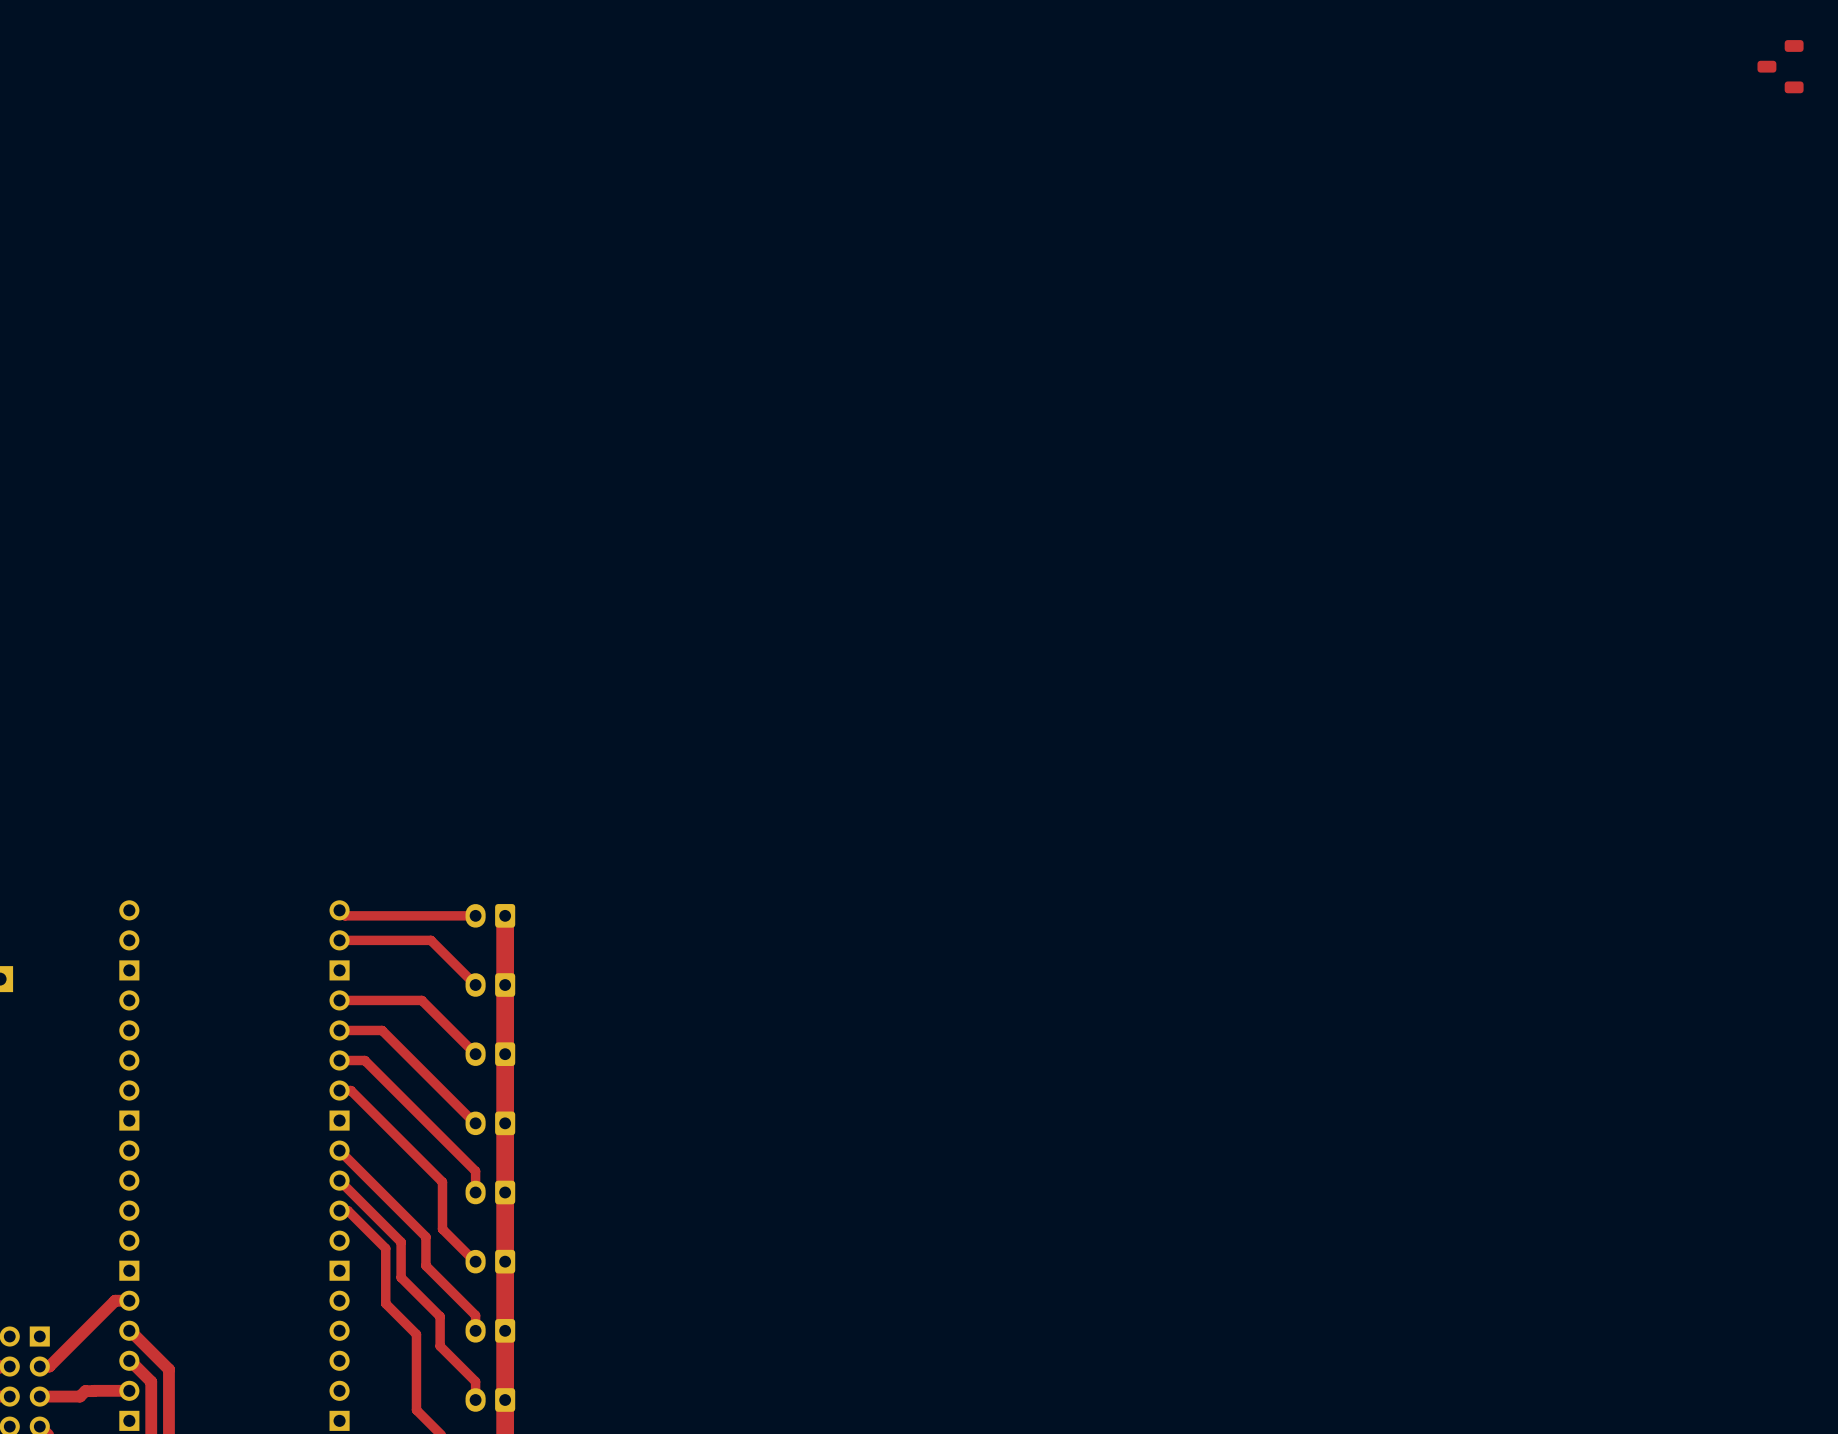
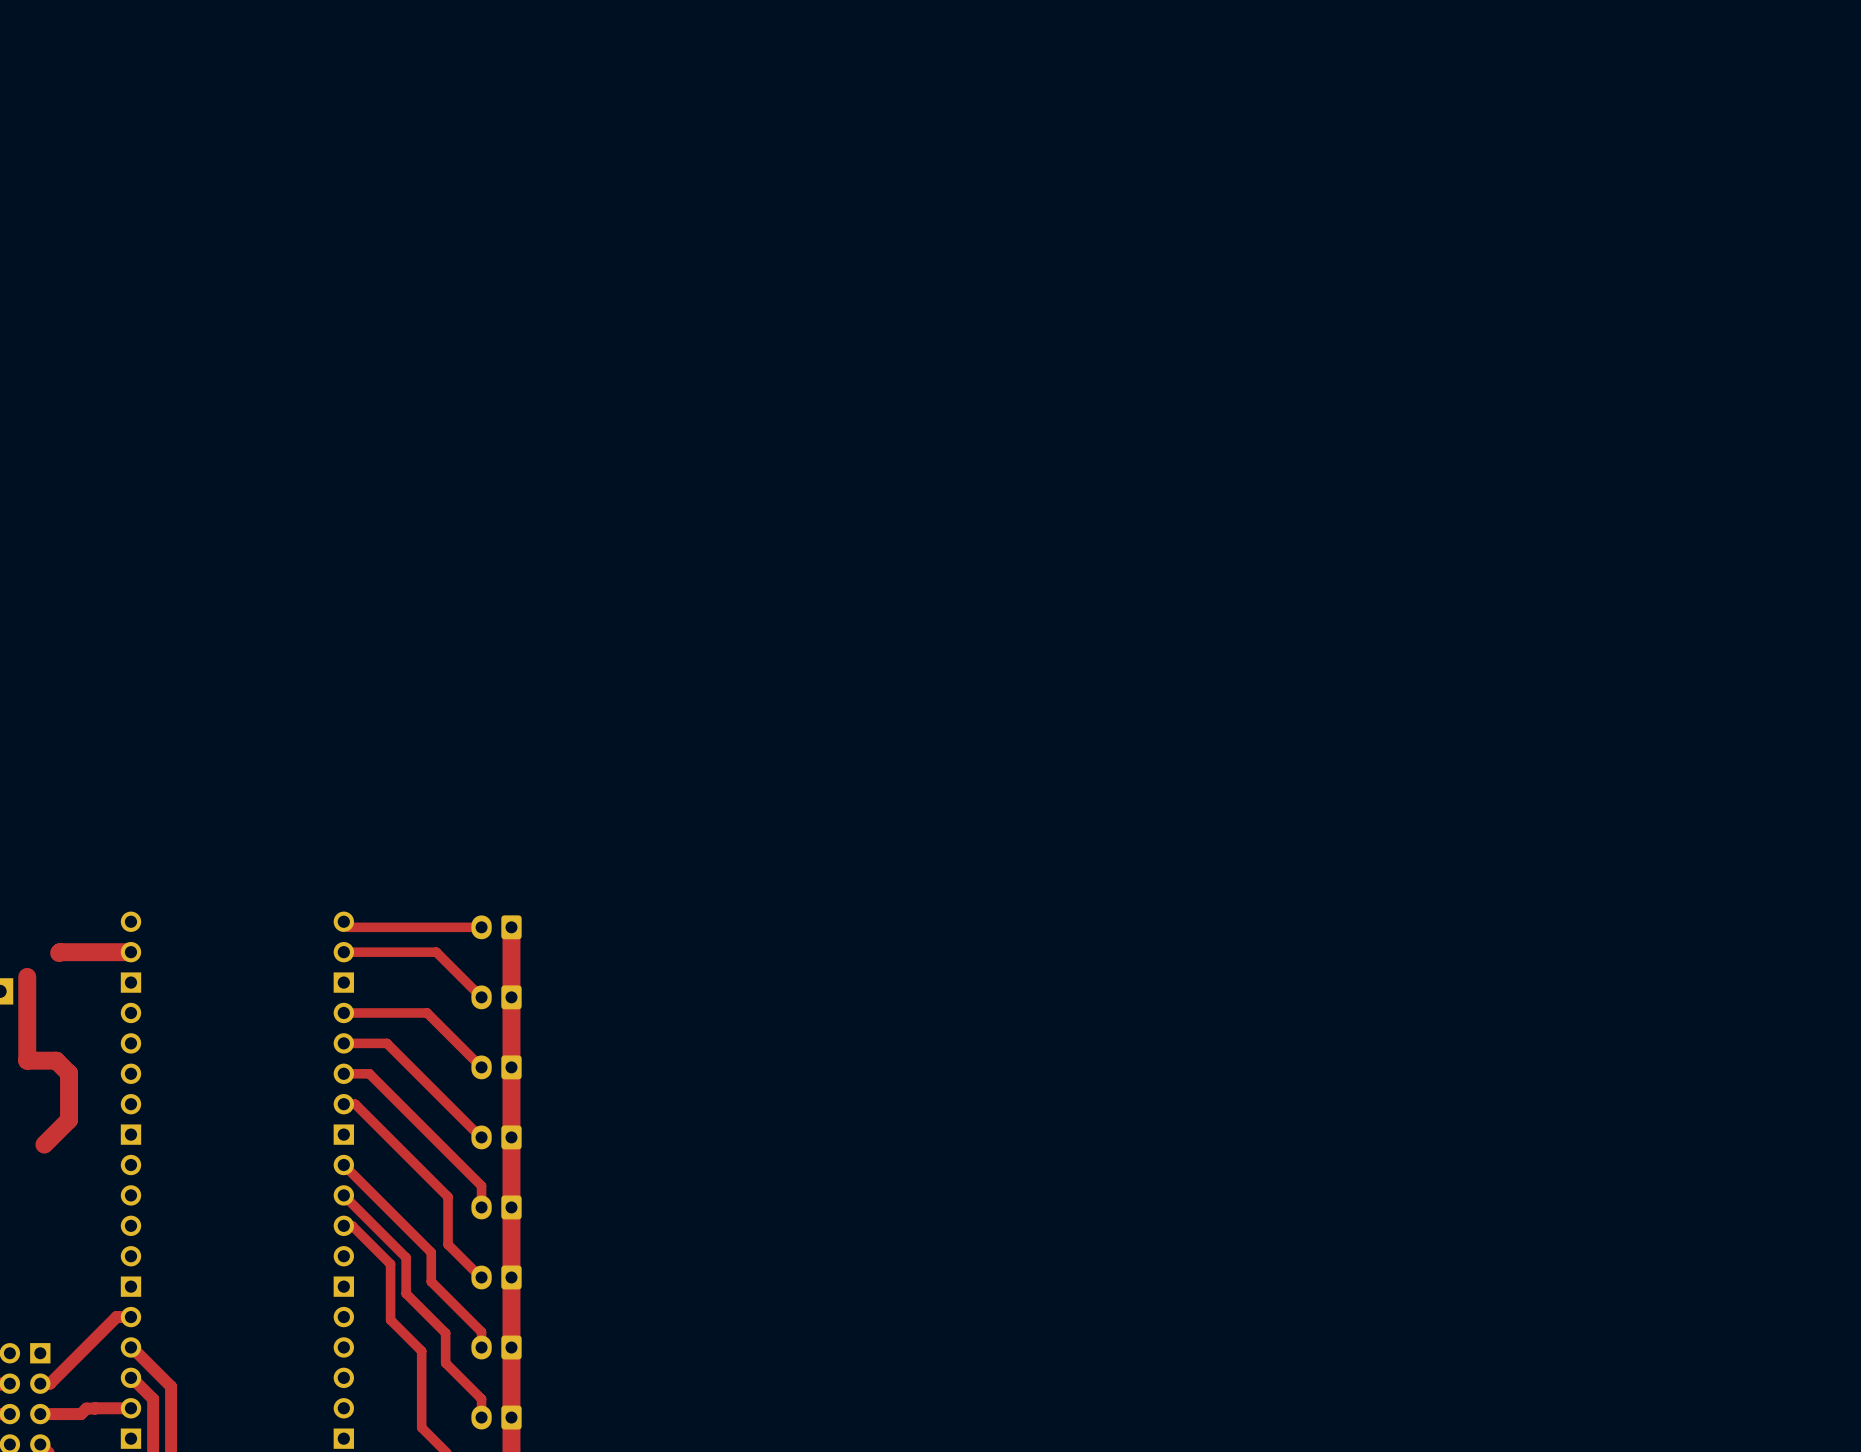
part: (1780, 66) -> none
top track: none -> (130, 952) (59, 953)
top track: none -> (27, 976) (27, 1060) (56, 1060) (69, 1073) (69, 1119) (44, 1144)

